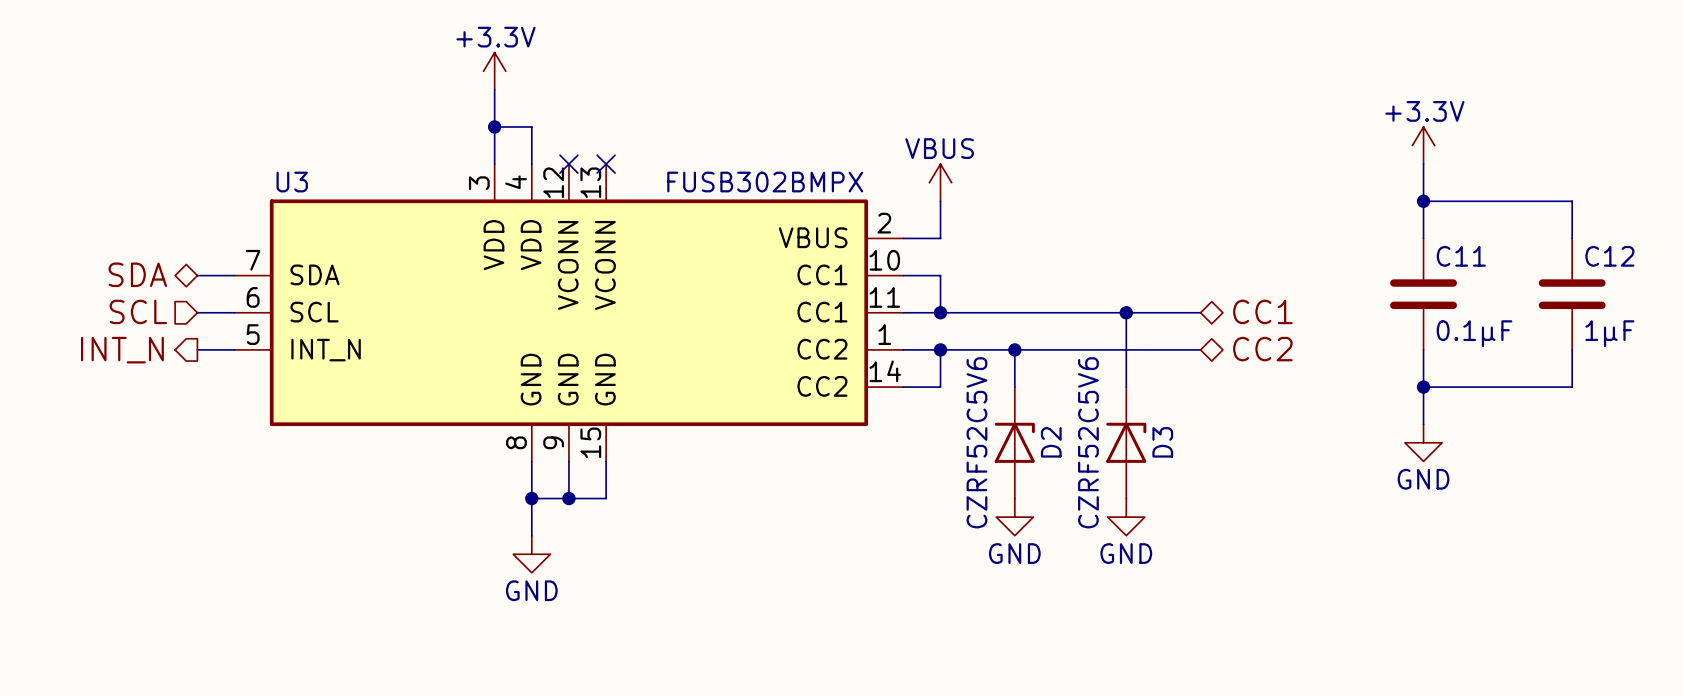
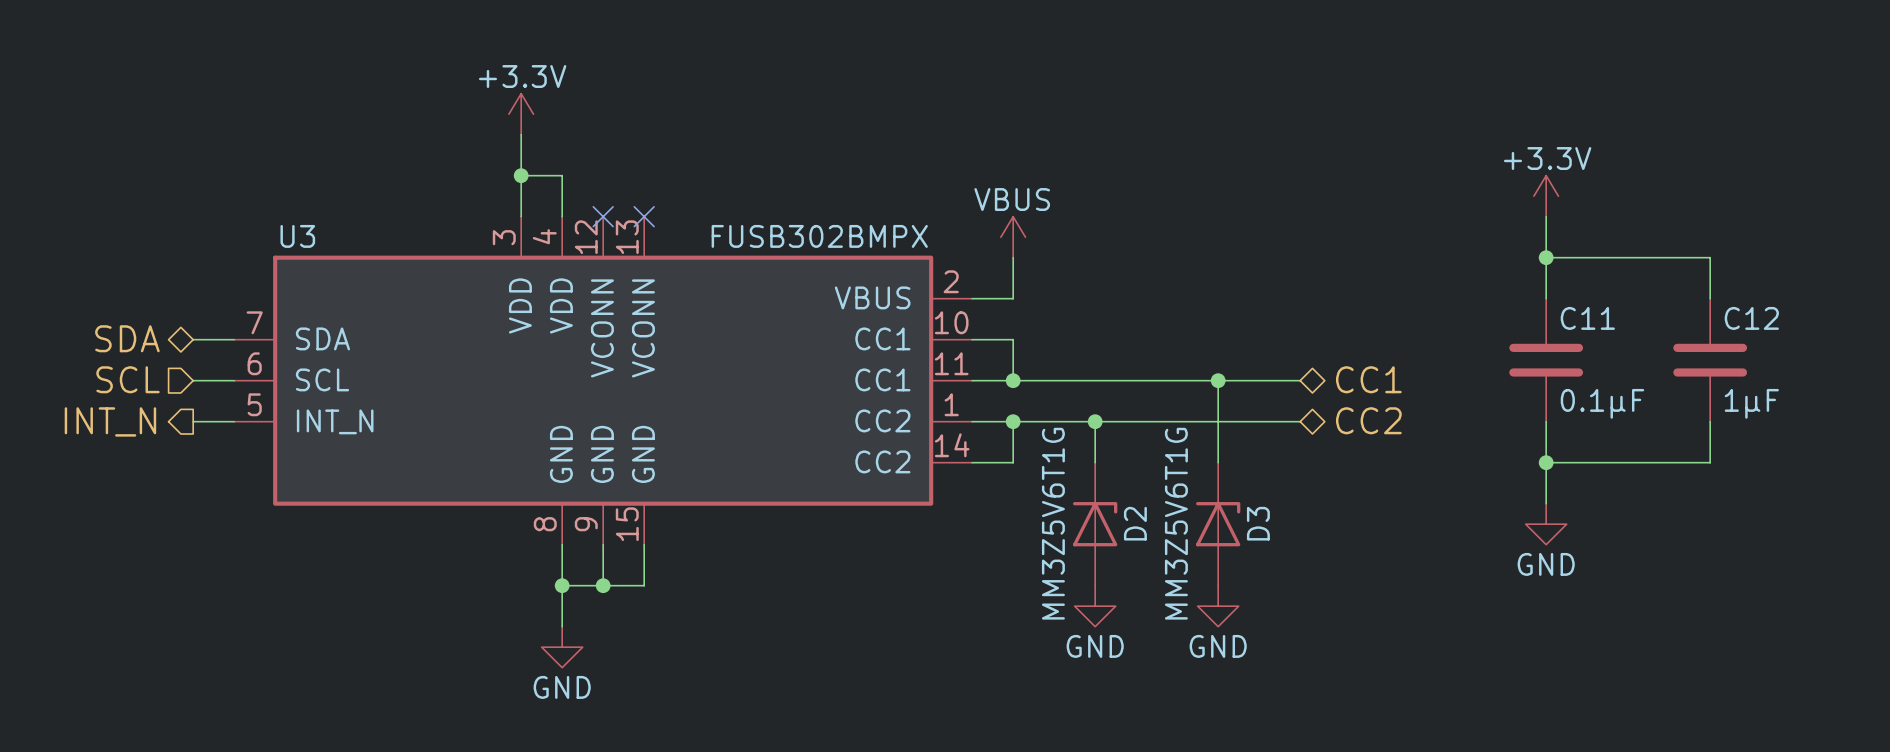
D2 value: CZRF52C5V6 (976, 442) -> MM3Z5V6T1G (1053, 523)
D3 value: CZRF52C5V6 (1088, 442) -> MM3Z5V6T1G (1176, 523)

